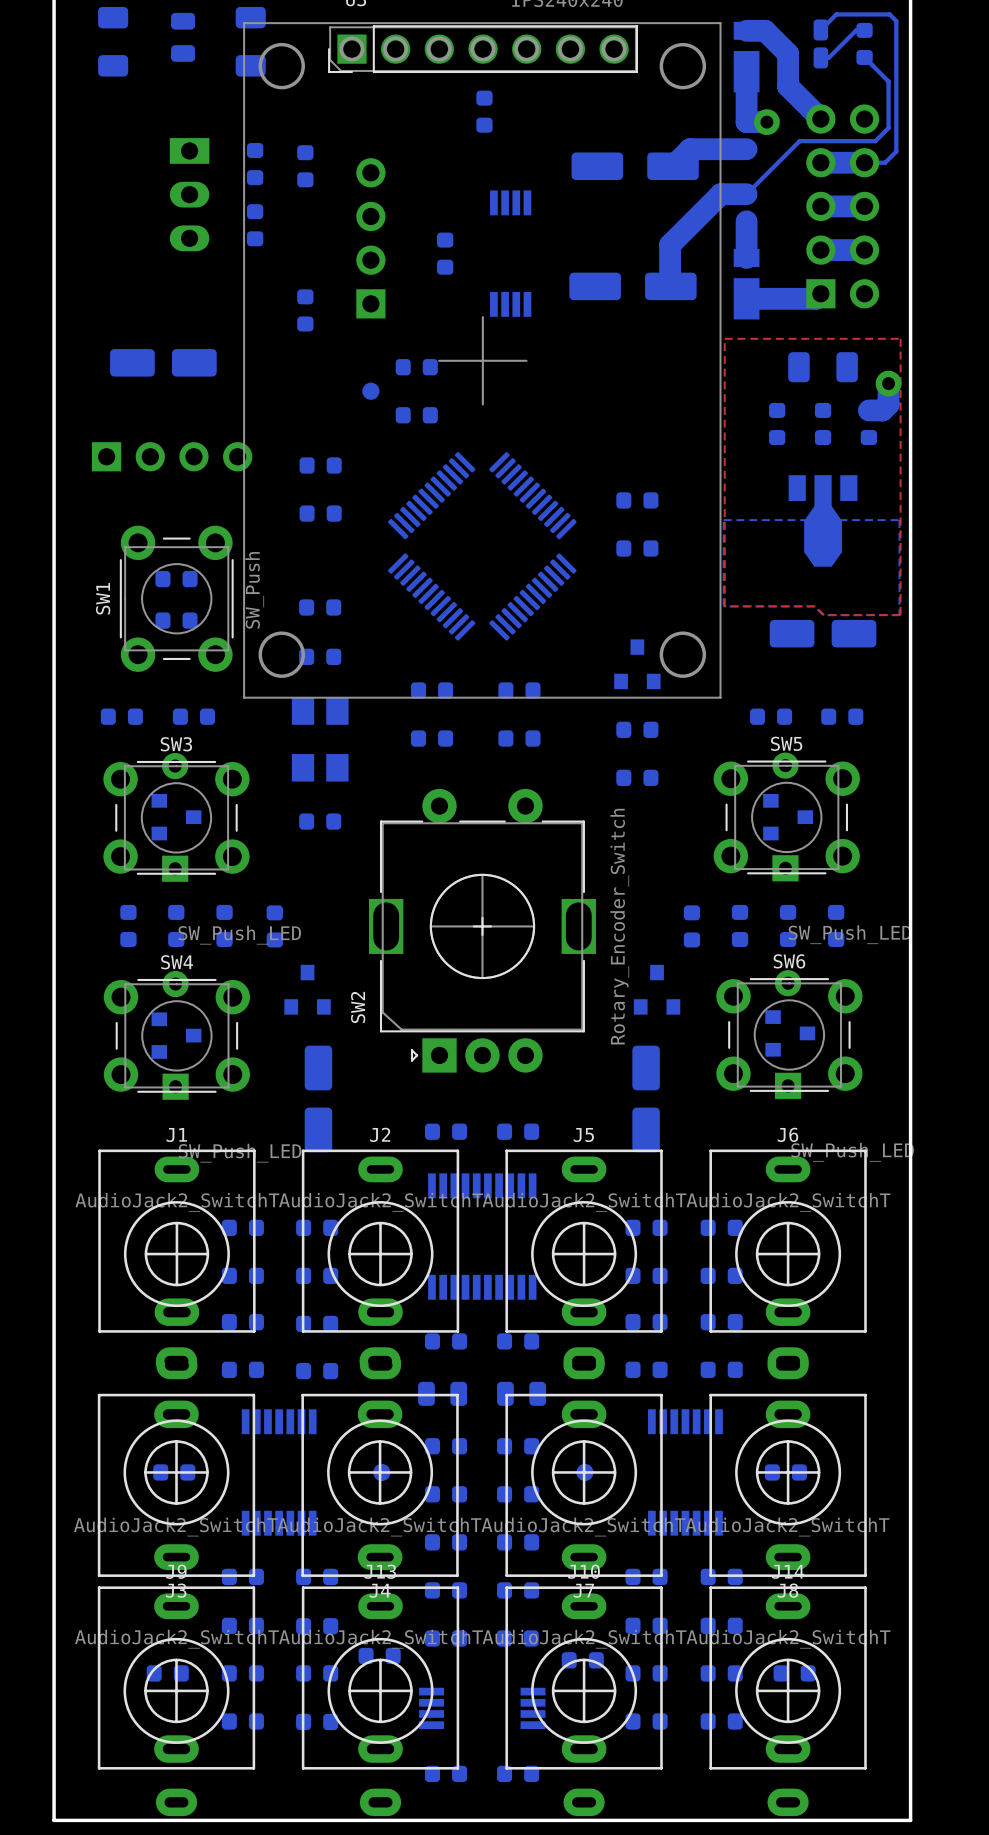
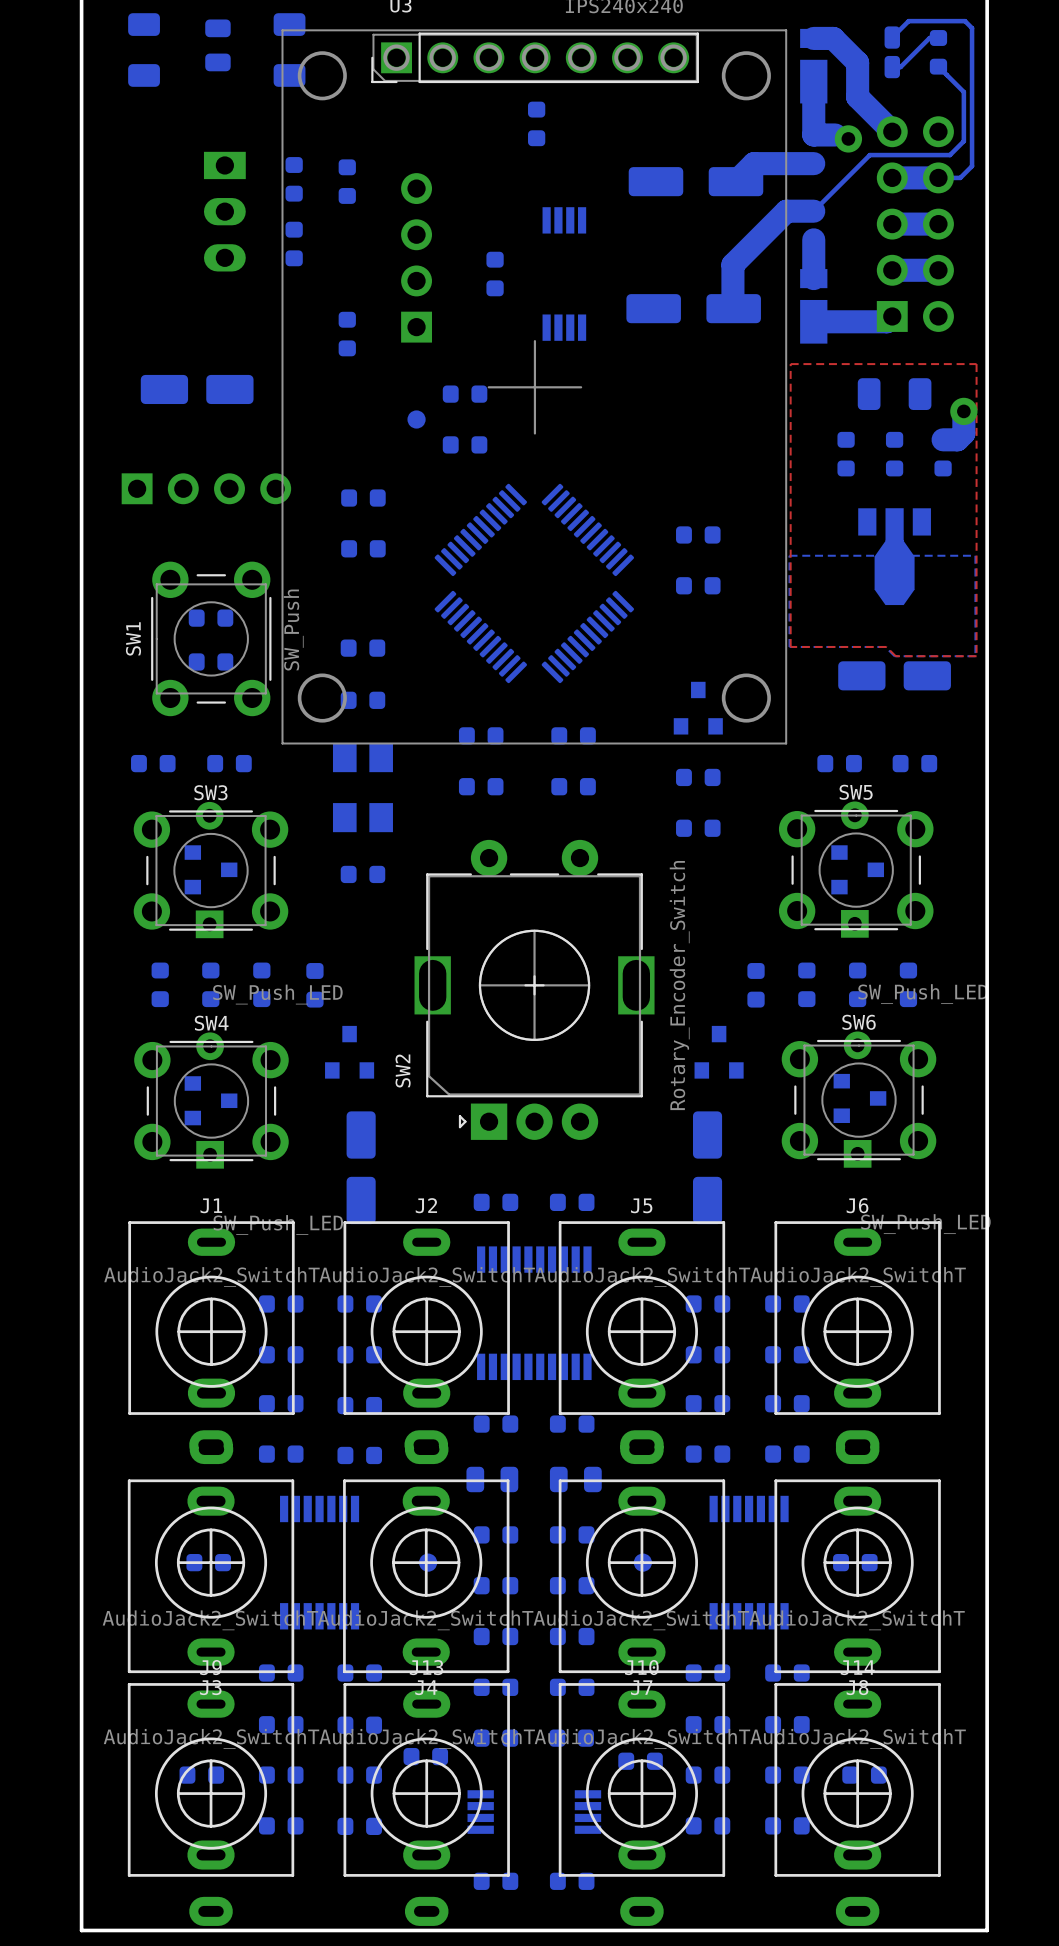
via position: (766, 122) -> (848, 138)

